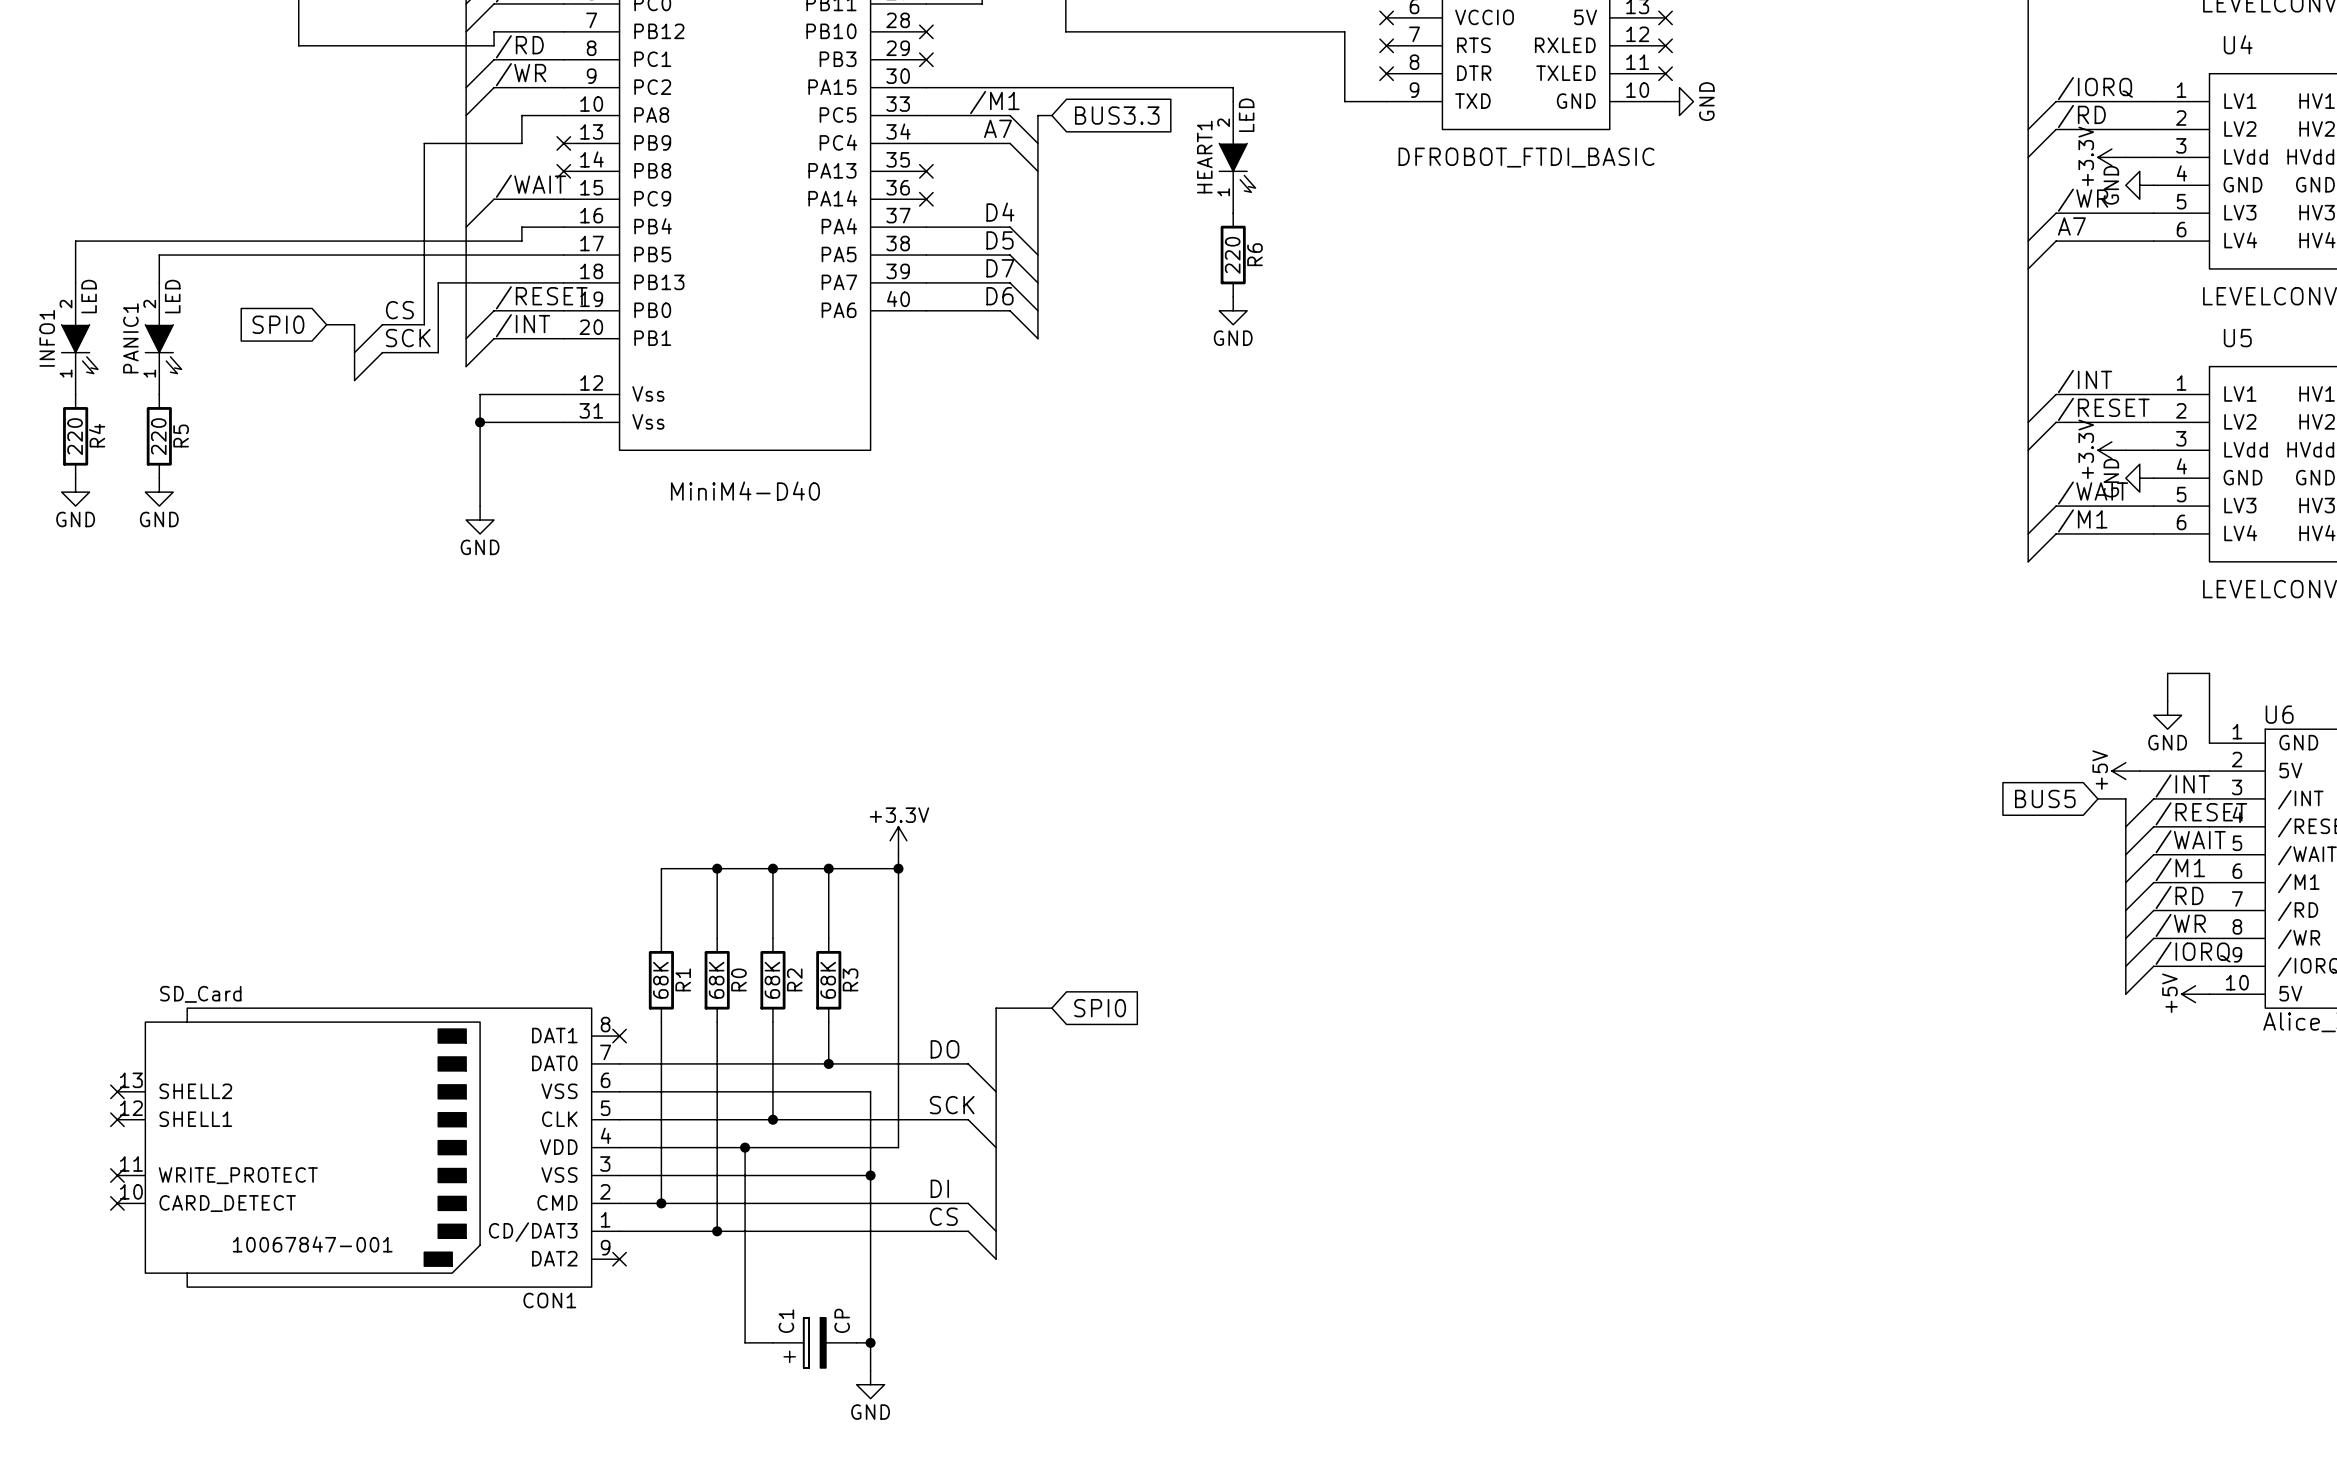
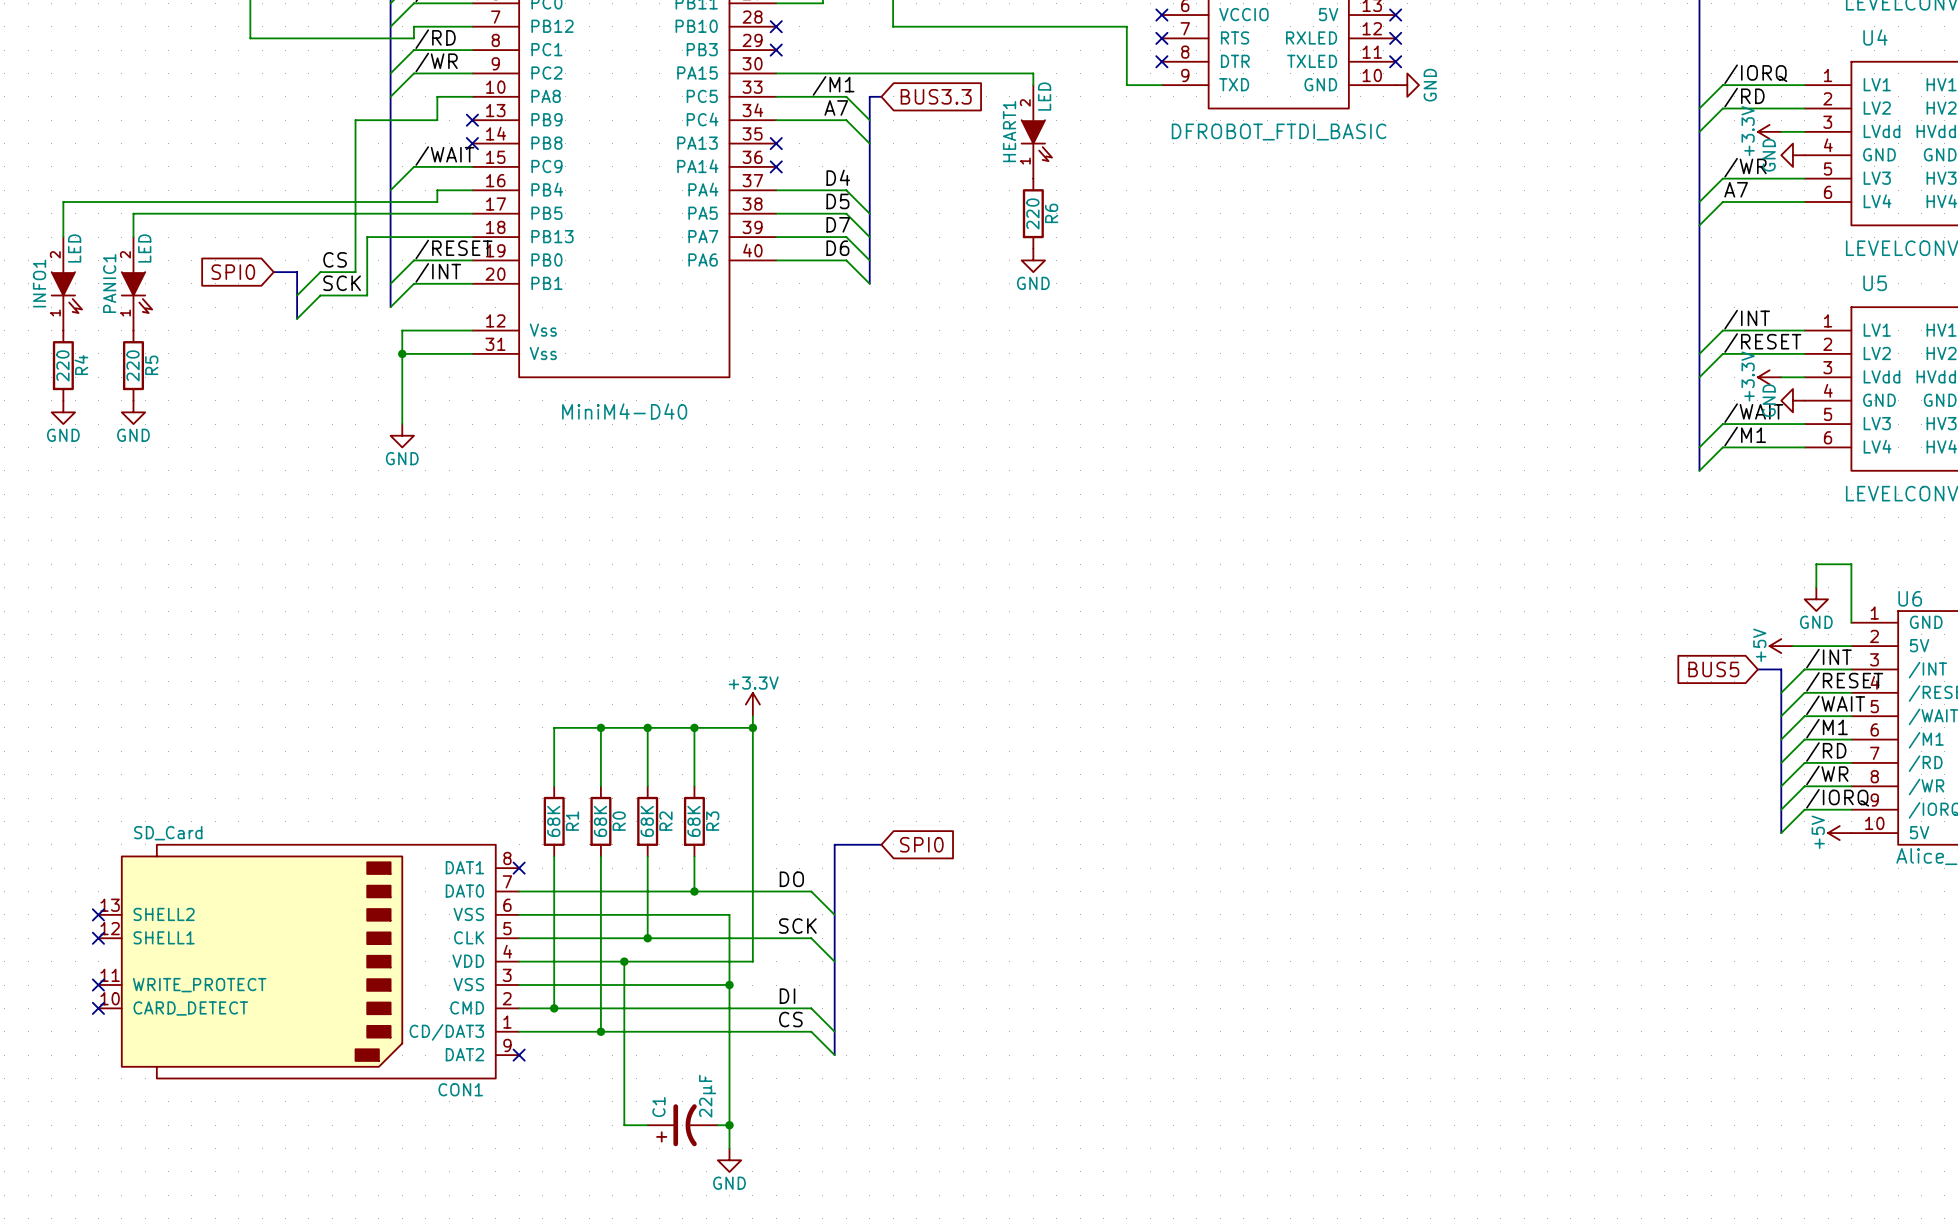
CON1 text: 10067847-001 (312, 1244) -> none
C1 symbol: [772, 1317, 857, 1368] -> [647, 1104, 718, 1147]
C1 value: CP (842, 1320) -> 22µF (707, 1096)

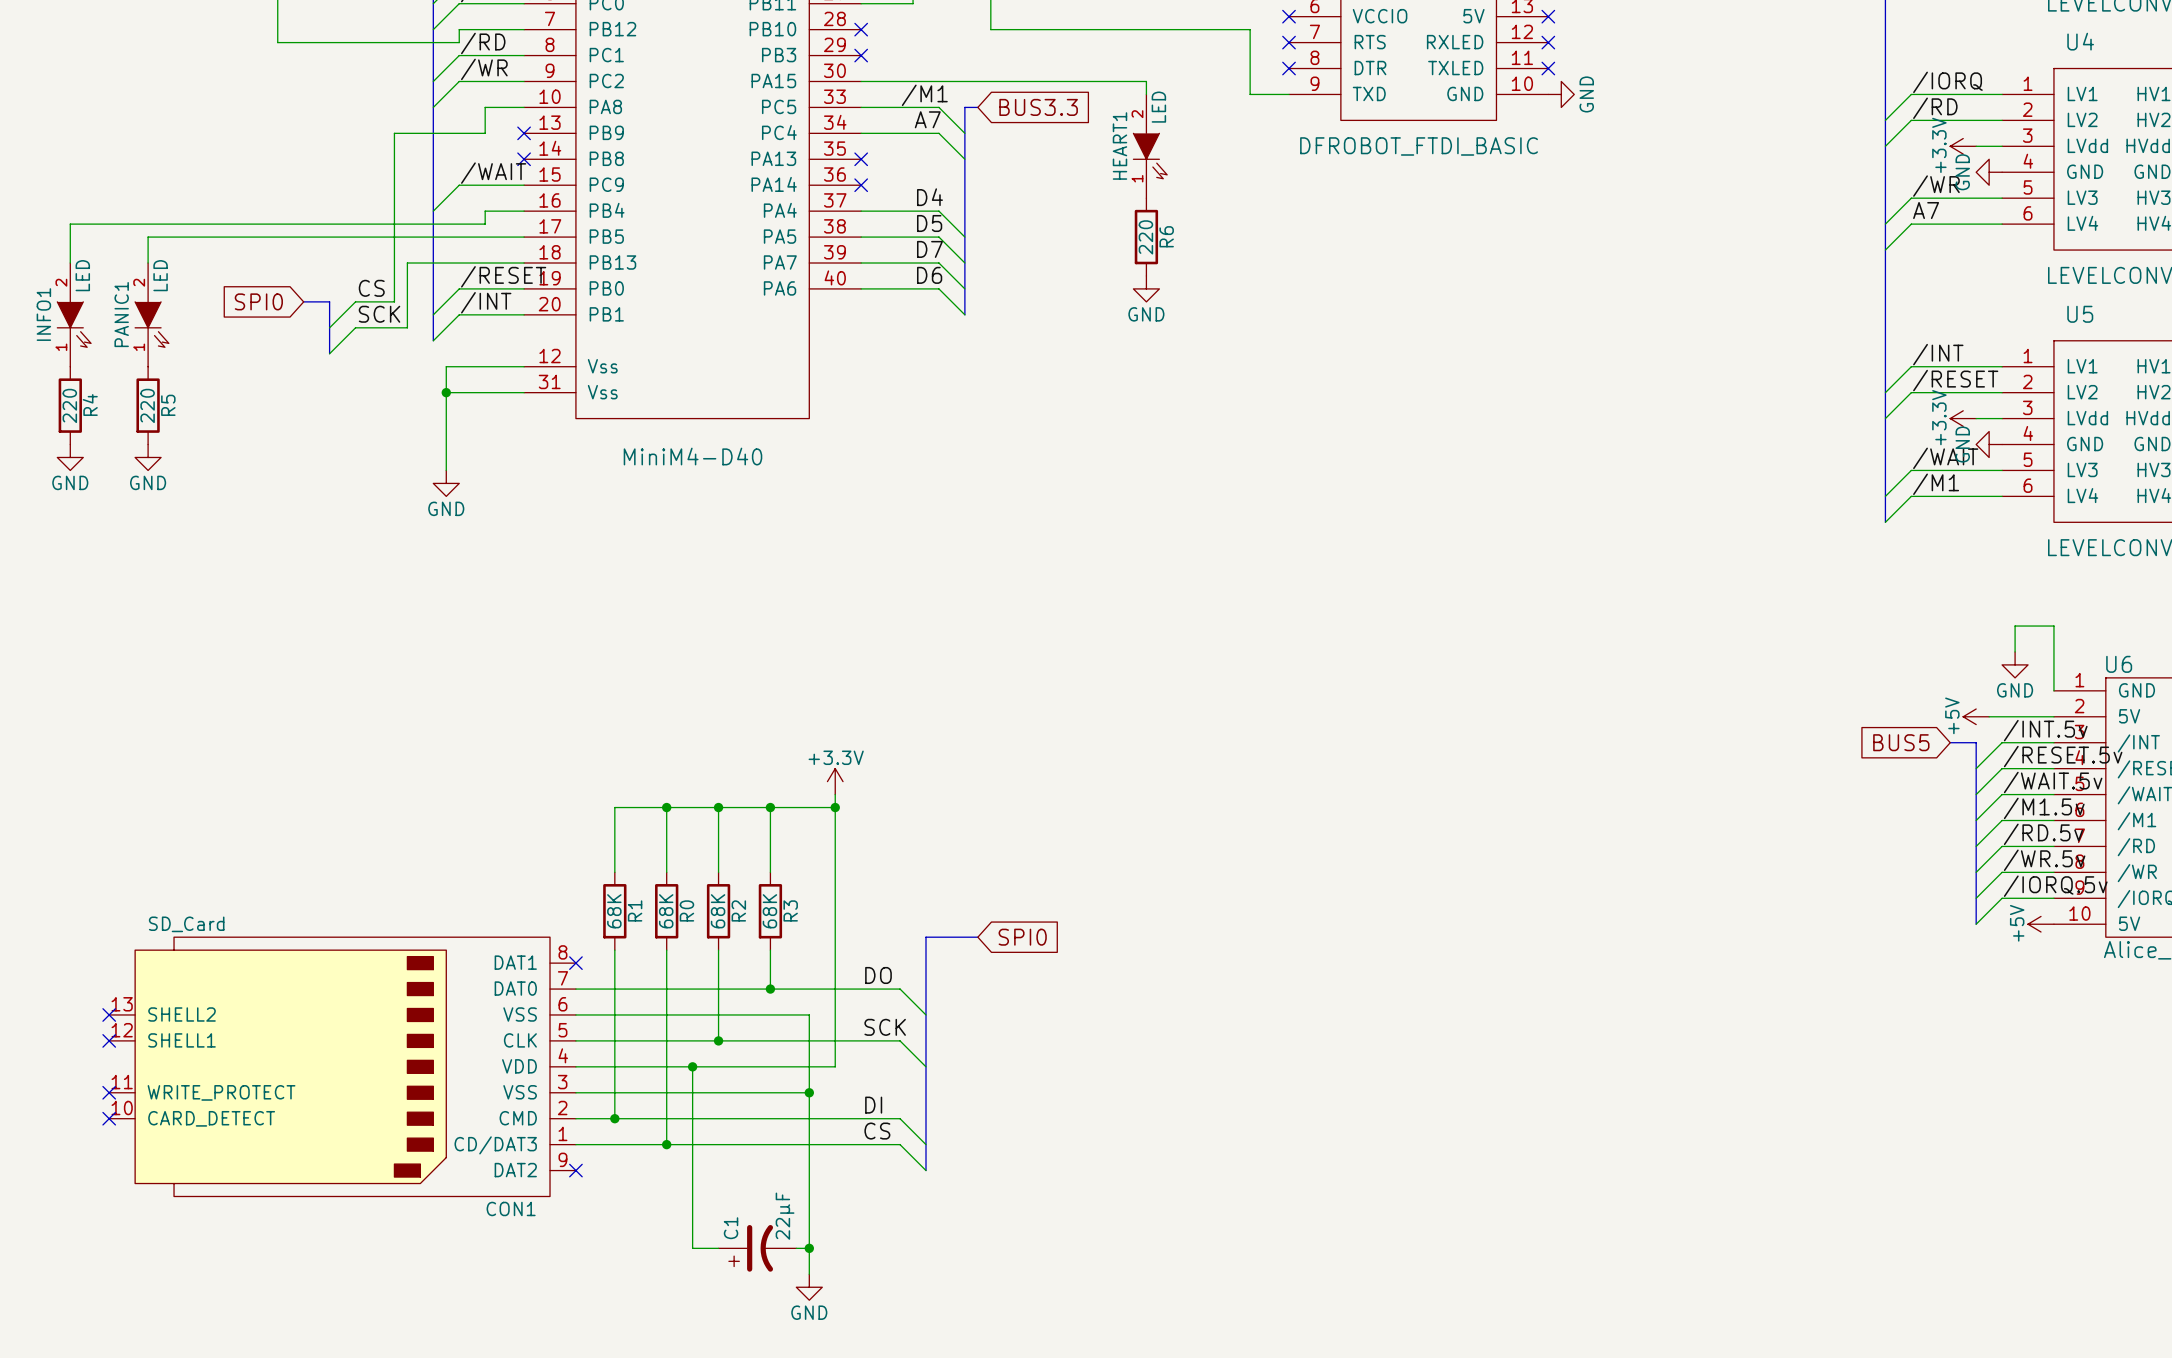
label: /INT (1828, 658) -> /INT.5v (2045, 730)
label: /RESET (1844, 681) -> /RESET.5v (2063, 756)
label: /WAIT (1835, 705) -> /WAIT.5v (2053, 782)
label: /M1 (1826, 728) -> /M1.5v (2044, 808)
label: /RD (1826, 752) -> /RD.5v (2043, 834)
label: /WR (1827, 775) -> /WR.5v (2044, 860)
label: /IORQ (1837, 798) -> /IORQ.5v (2055, 886)

